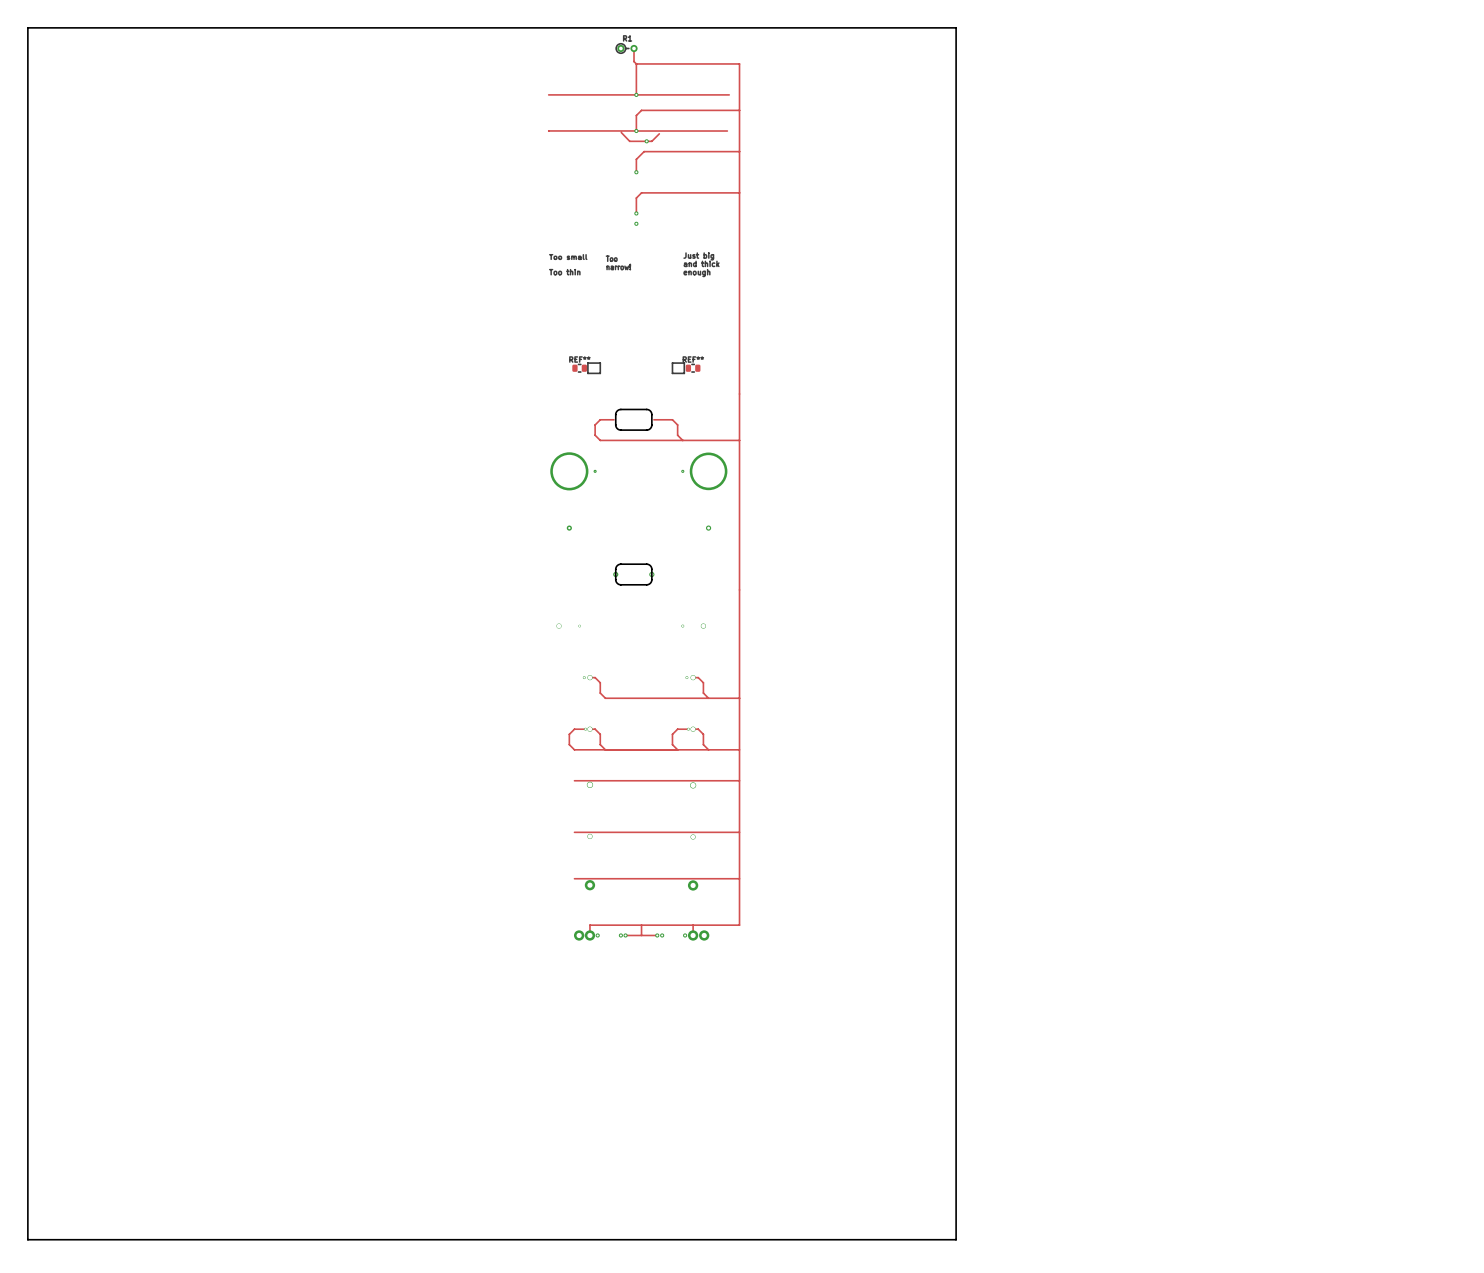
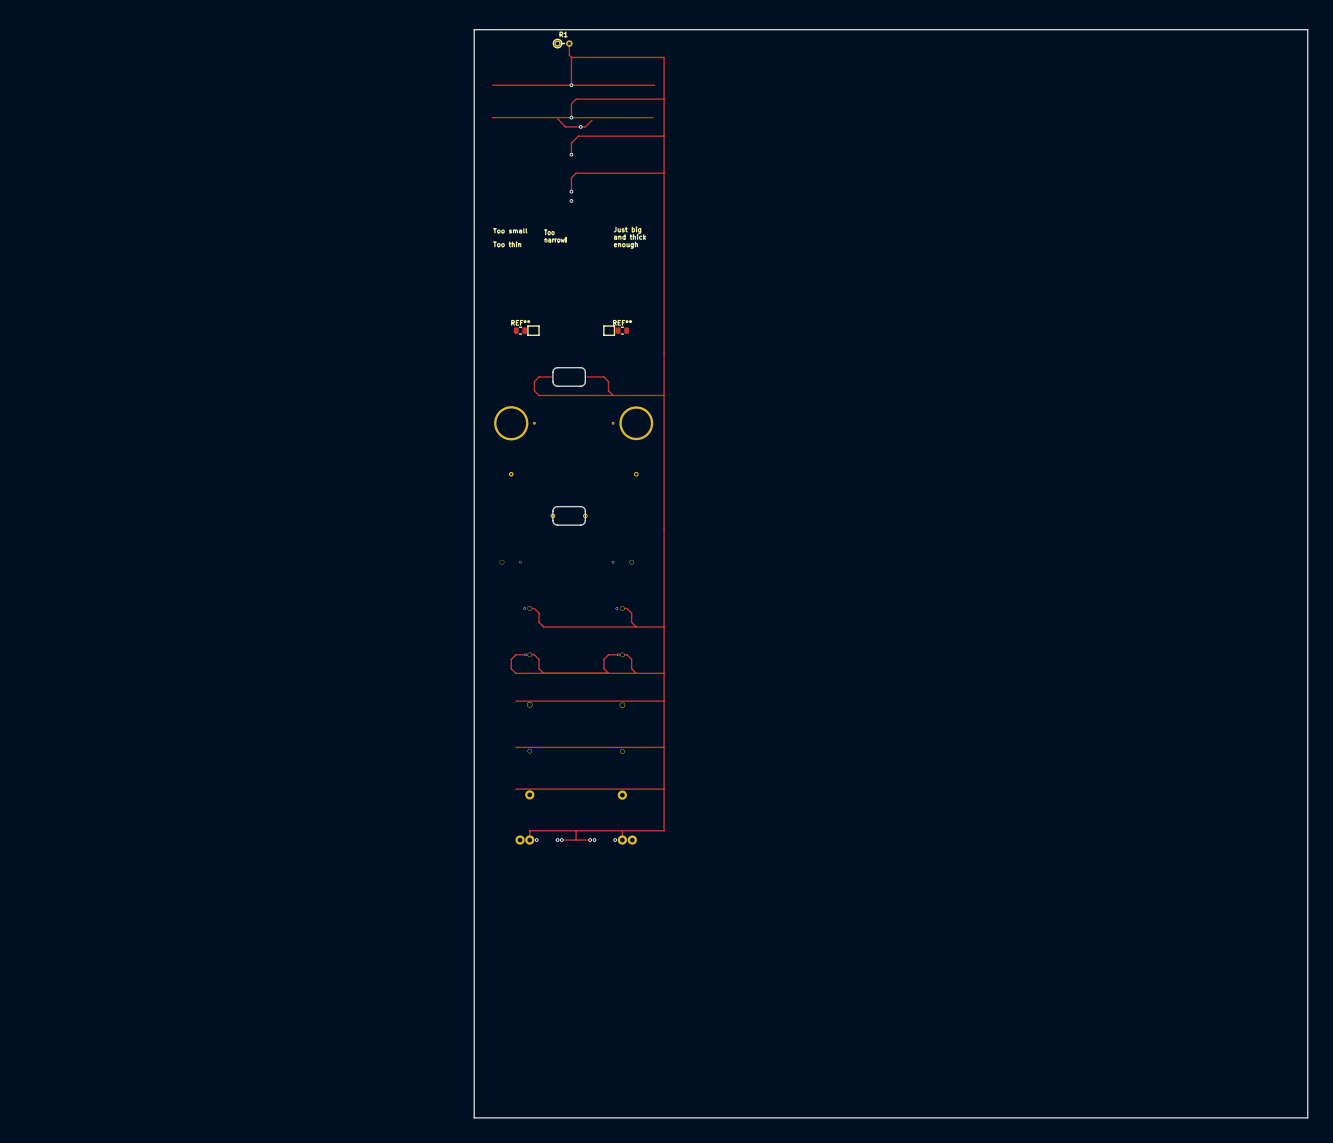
board edge: (27, 27) (956, 27) (956, 1239) (27, 1239) (27, 27) -> none
board edge: none -> (474, 29) (1307, 29) (1307, 1117) (474, 1117) (474, 29)

